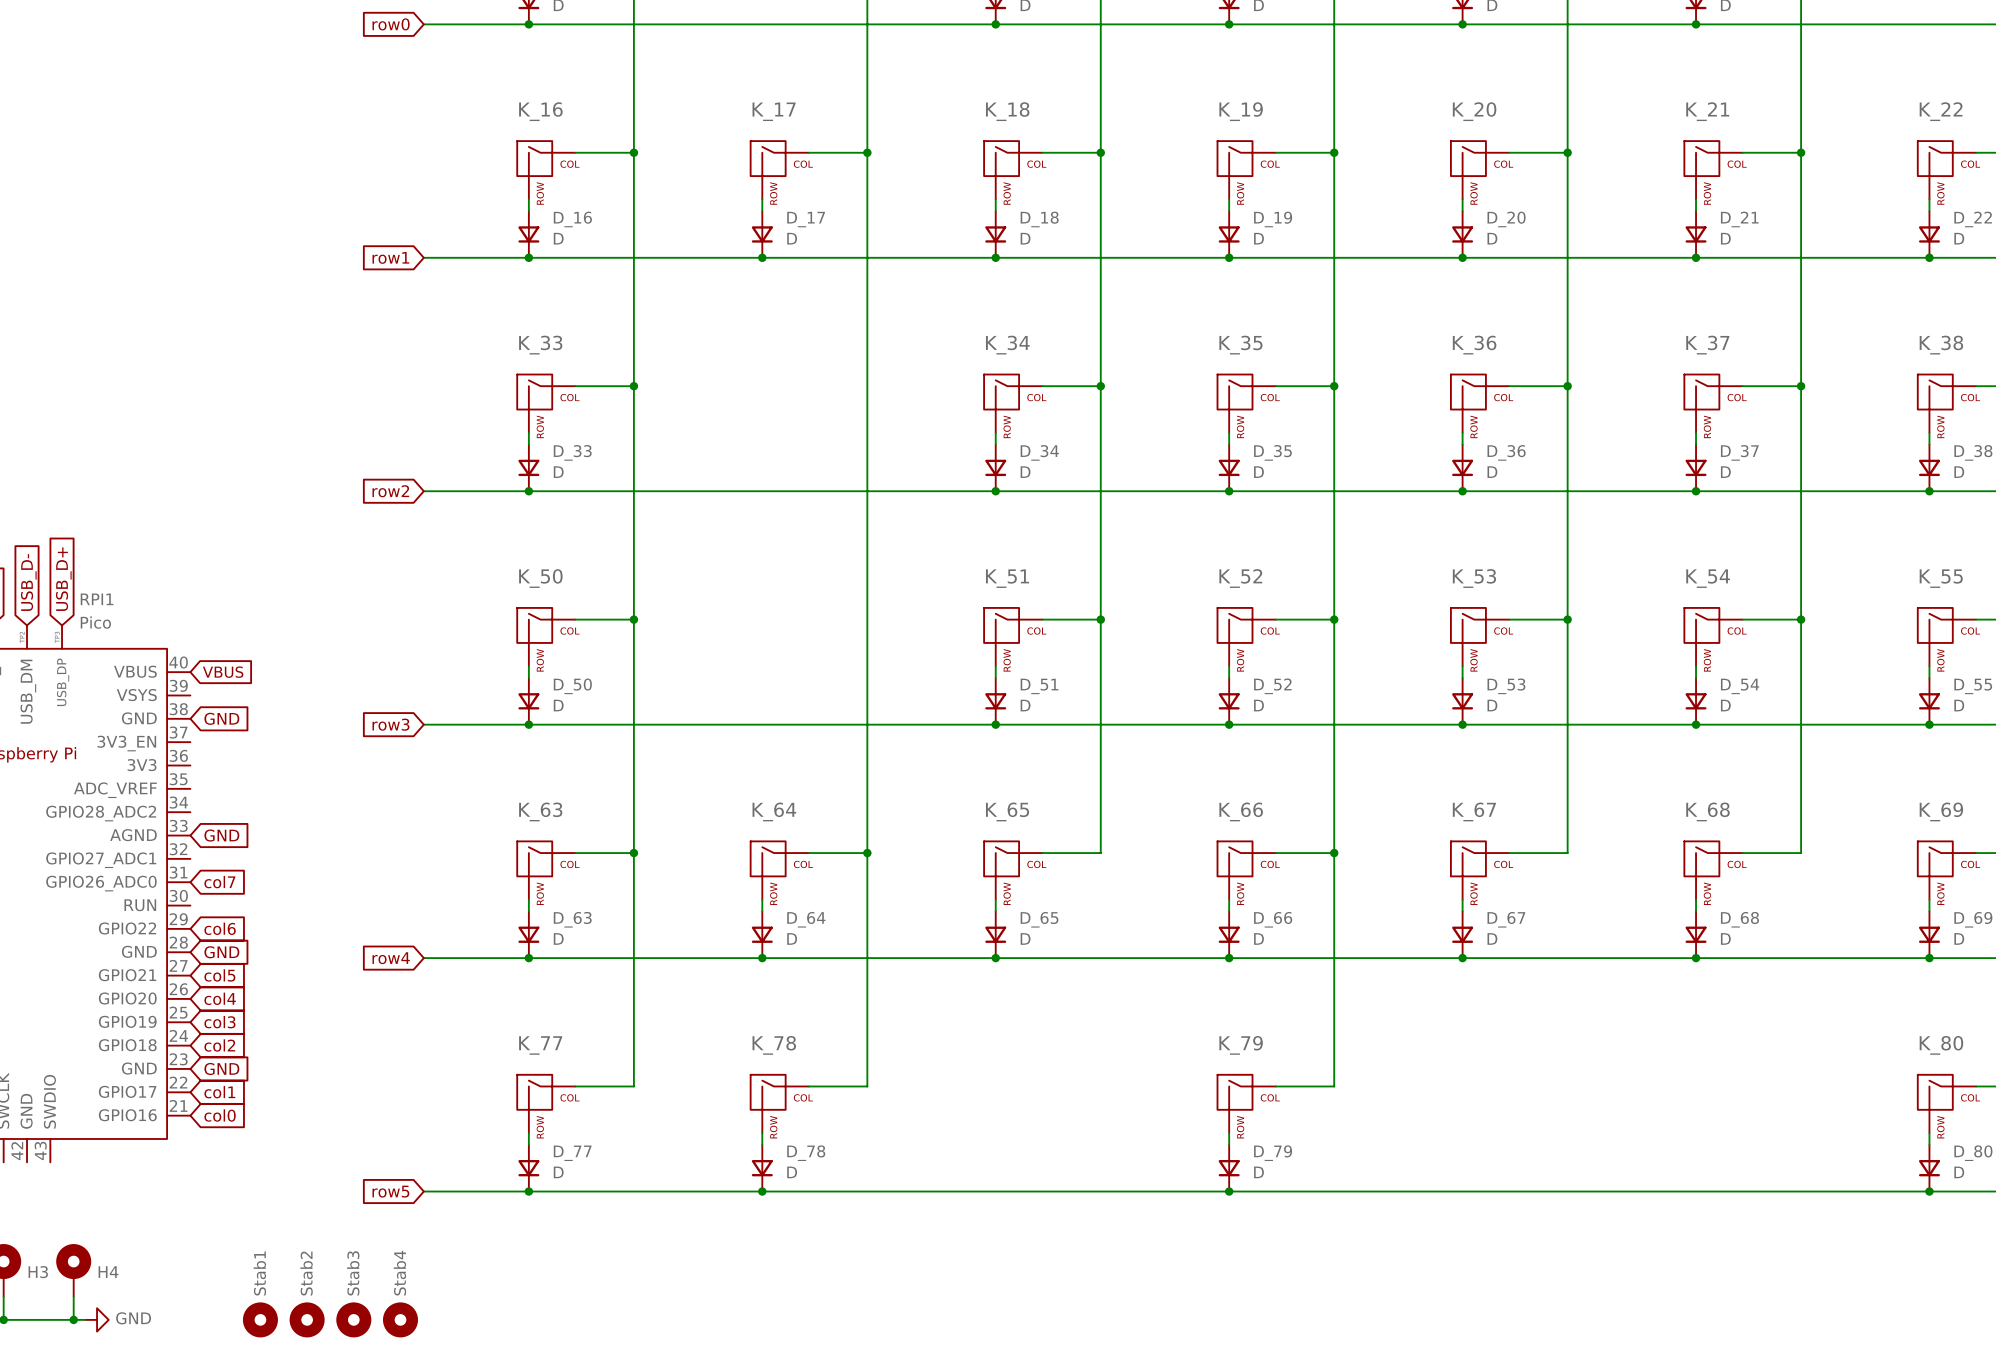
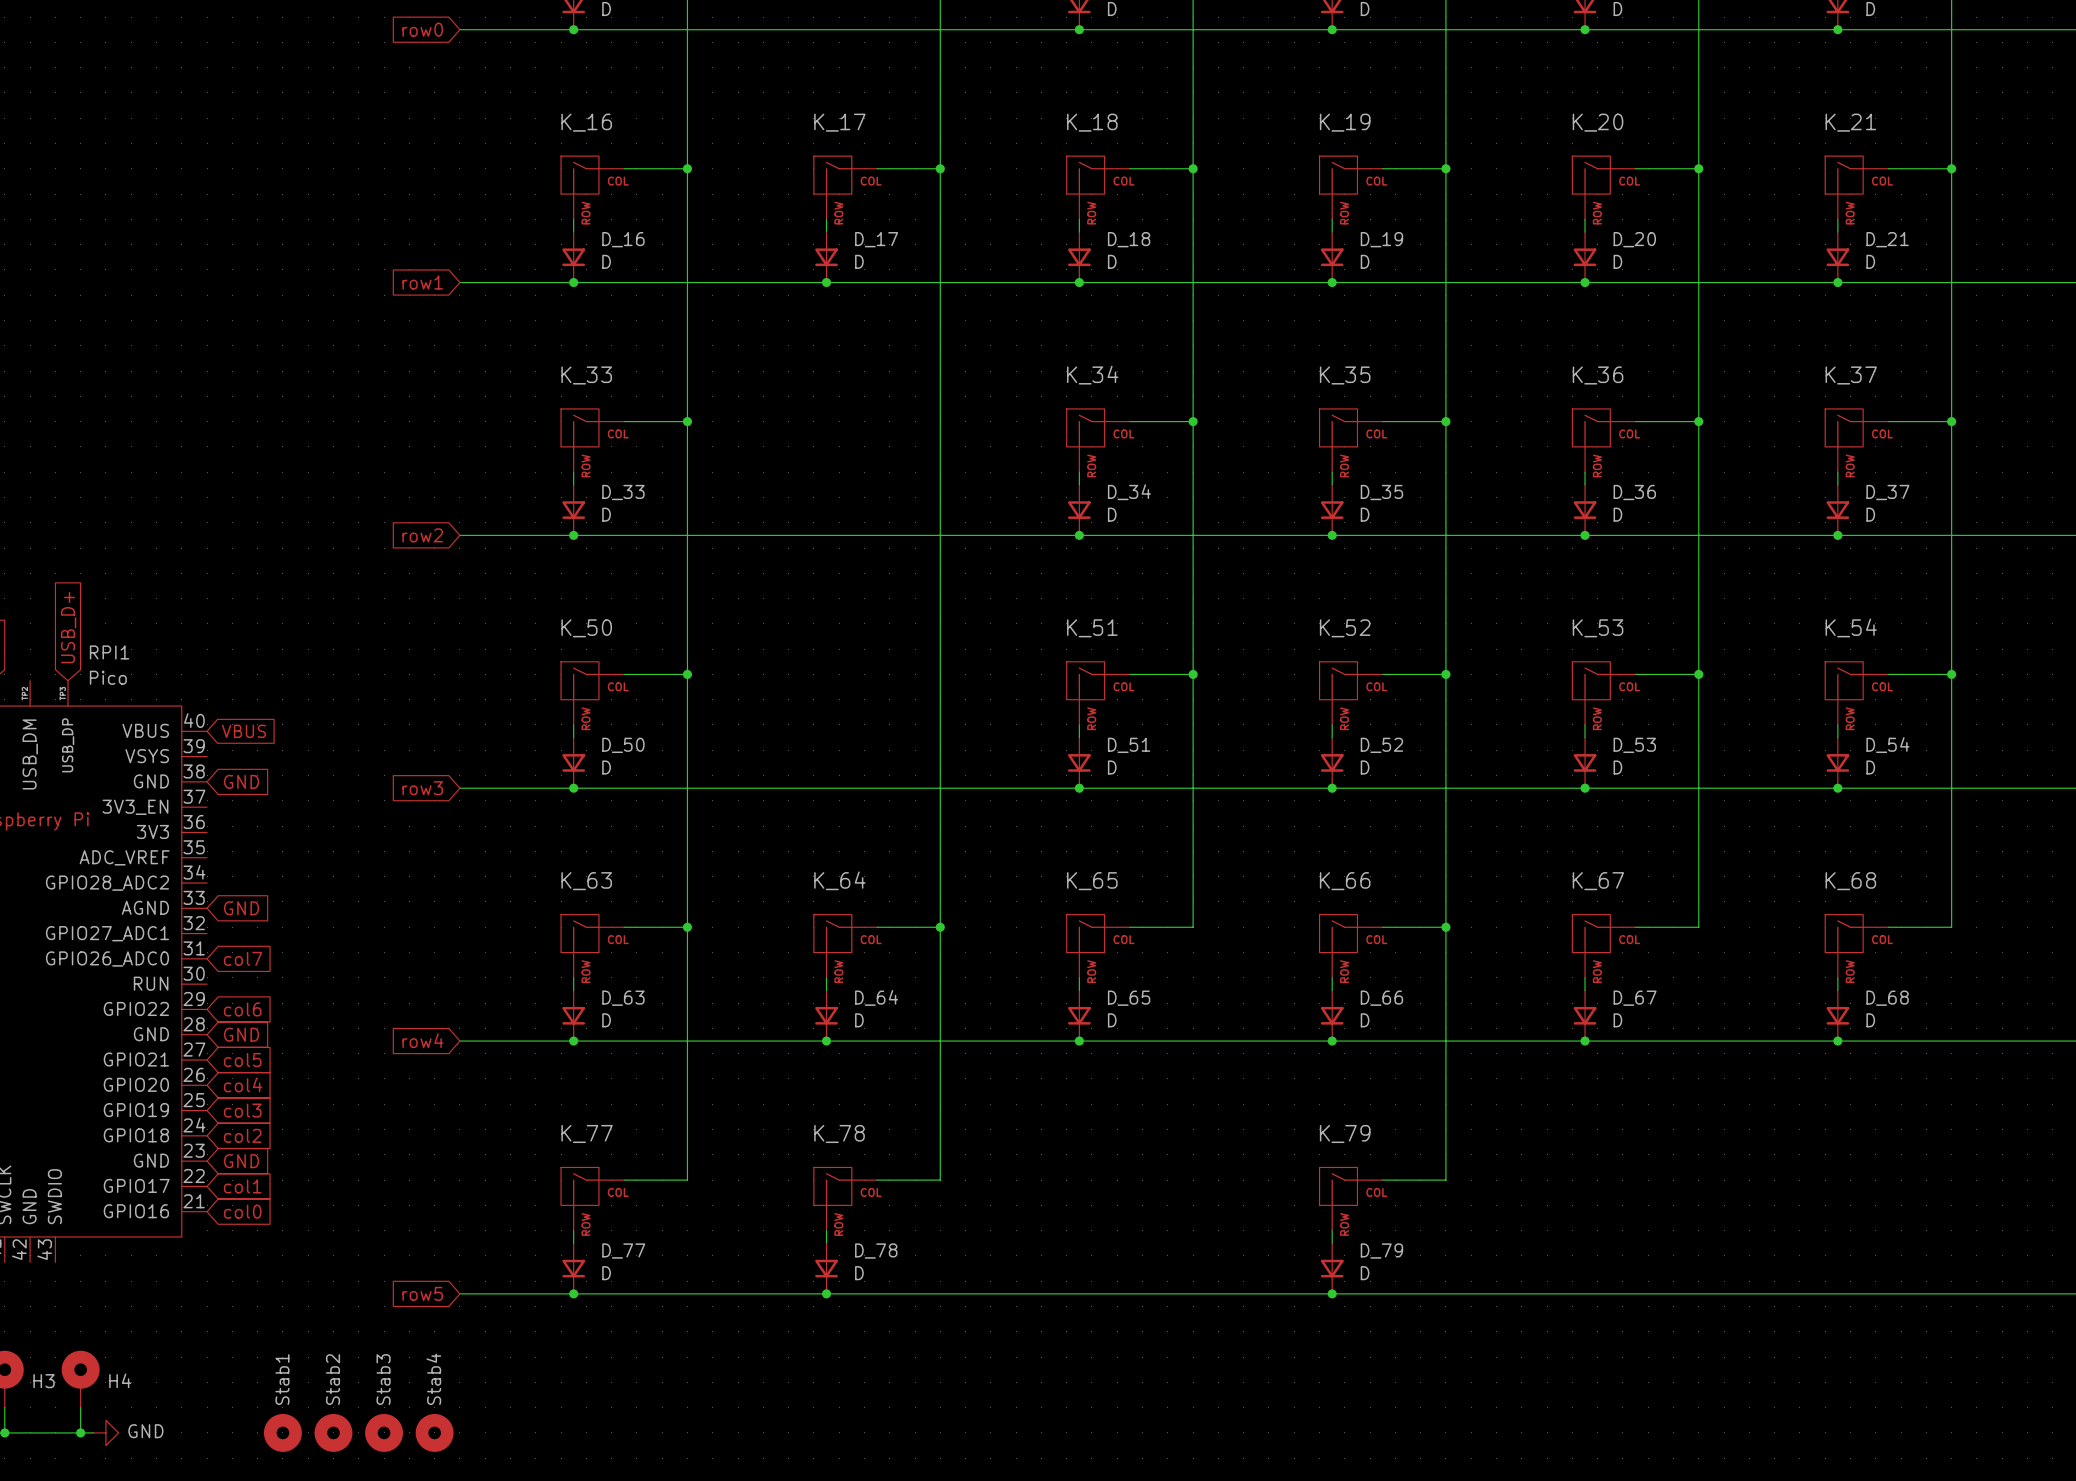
global label: USB_D- (28, 582) -> none

